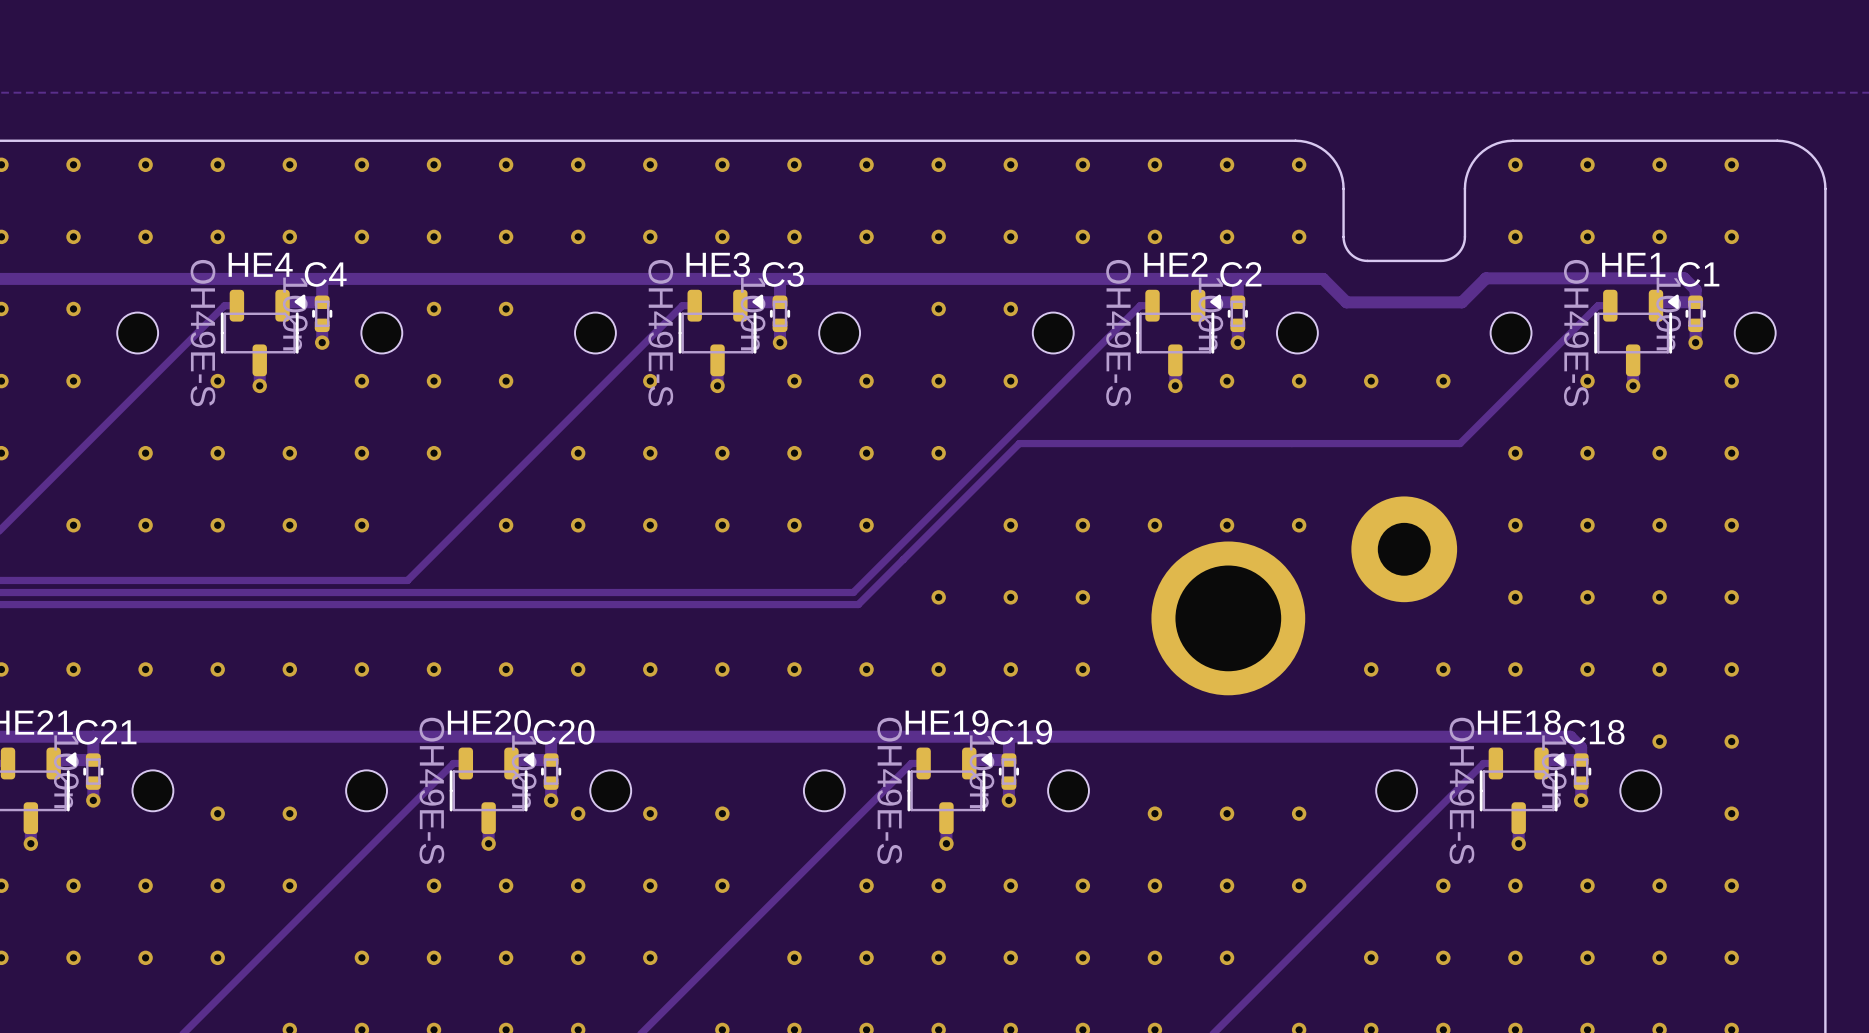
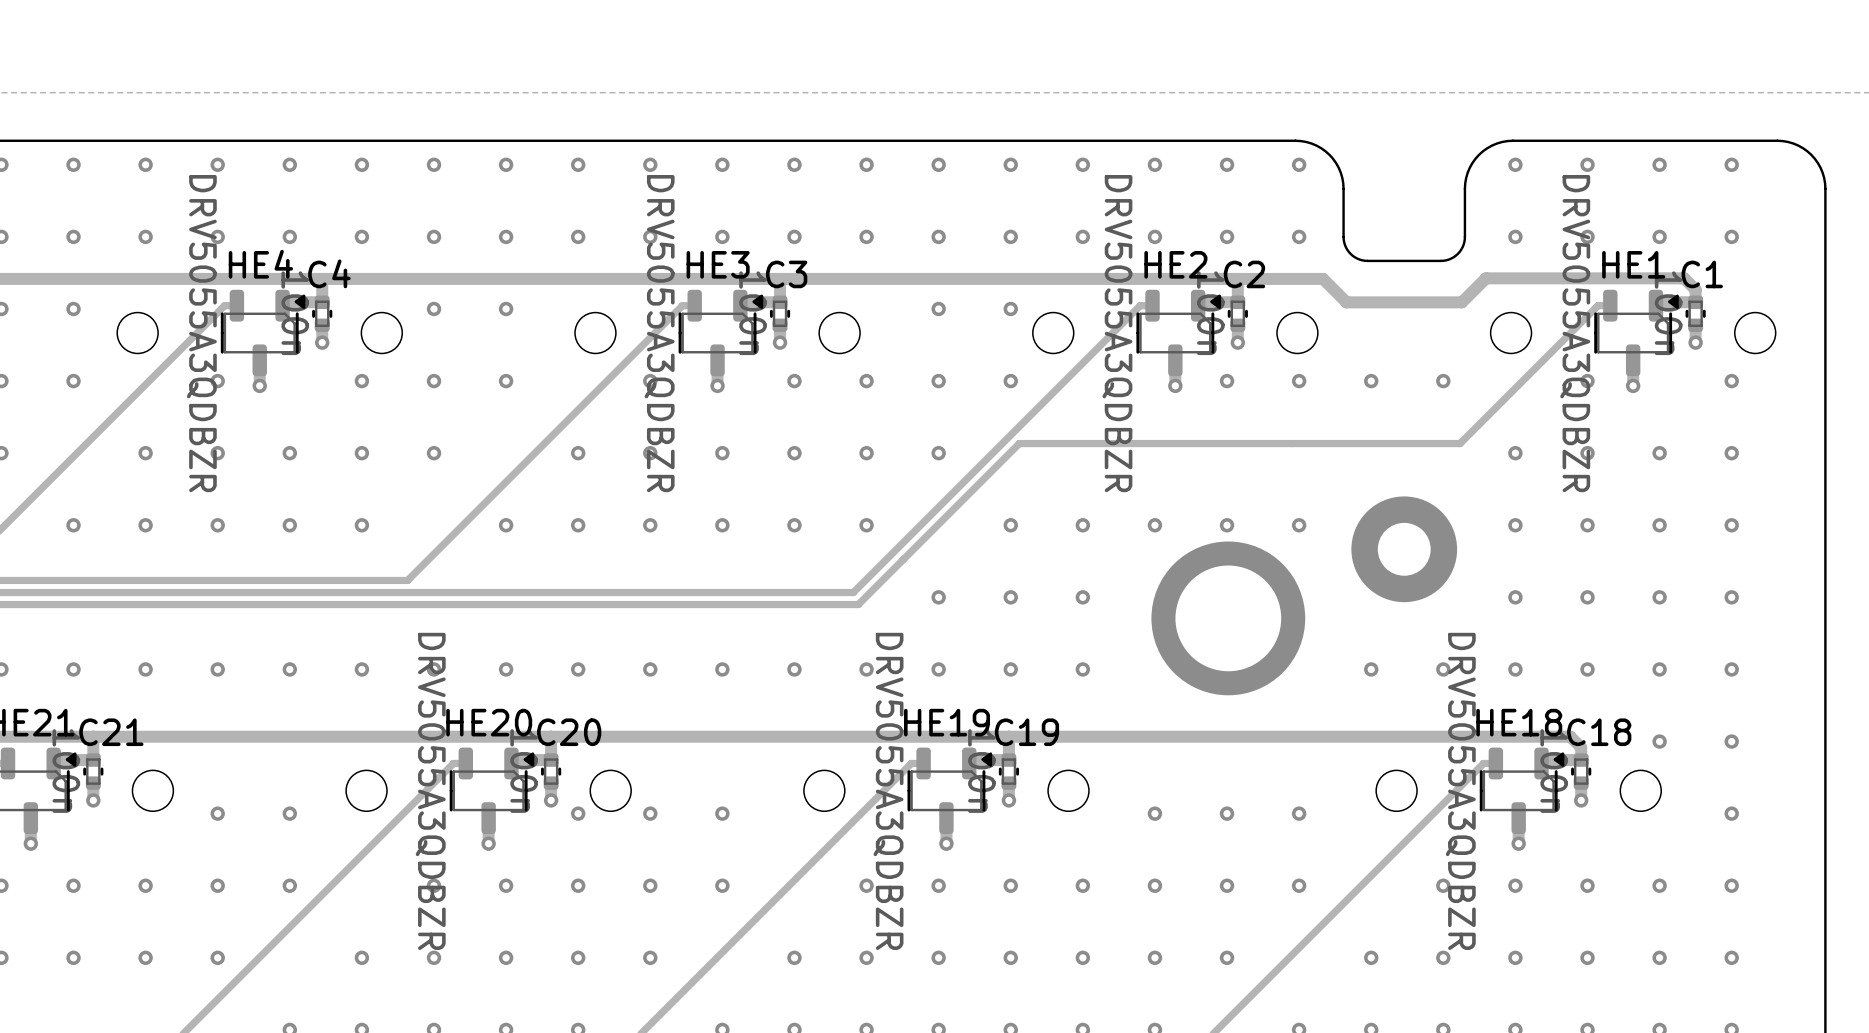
HE4 value: OH49E-S (202, 333) -> DRV5055A3QDBZR (201, 333)
HE3 value: OH49E-S (660, 333) -> DRV5055A3QDBZR (659, 333)
HE2 value: OH49E-S (1118, 333) -> DRV5055A3QDBZR (1117, 333)
HE1 value: OH49E-S (1576, 333) -> DRV5055A3QDBZR (1575, 333)
HE20 value: OH49E-S (431, 790) -> DRV5055A3QDBZR (430, 791)
HE19 value: OH49E-S (889, 790) -> DRV5055A3QDBZR (888, 791)
HE18 value: OH49E-S (1461, 790) -> DRV5055A3QDBZR (1460, 791)

